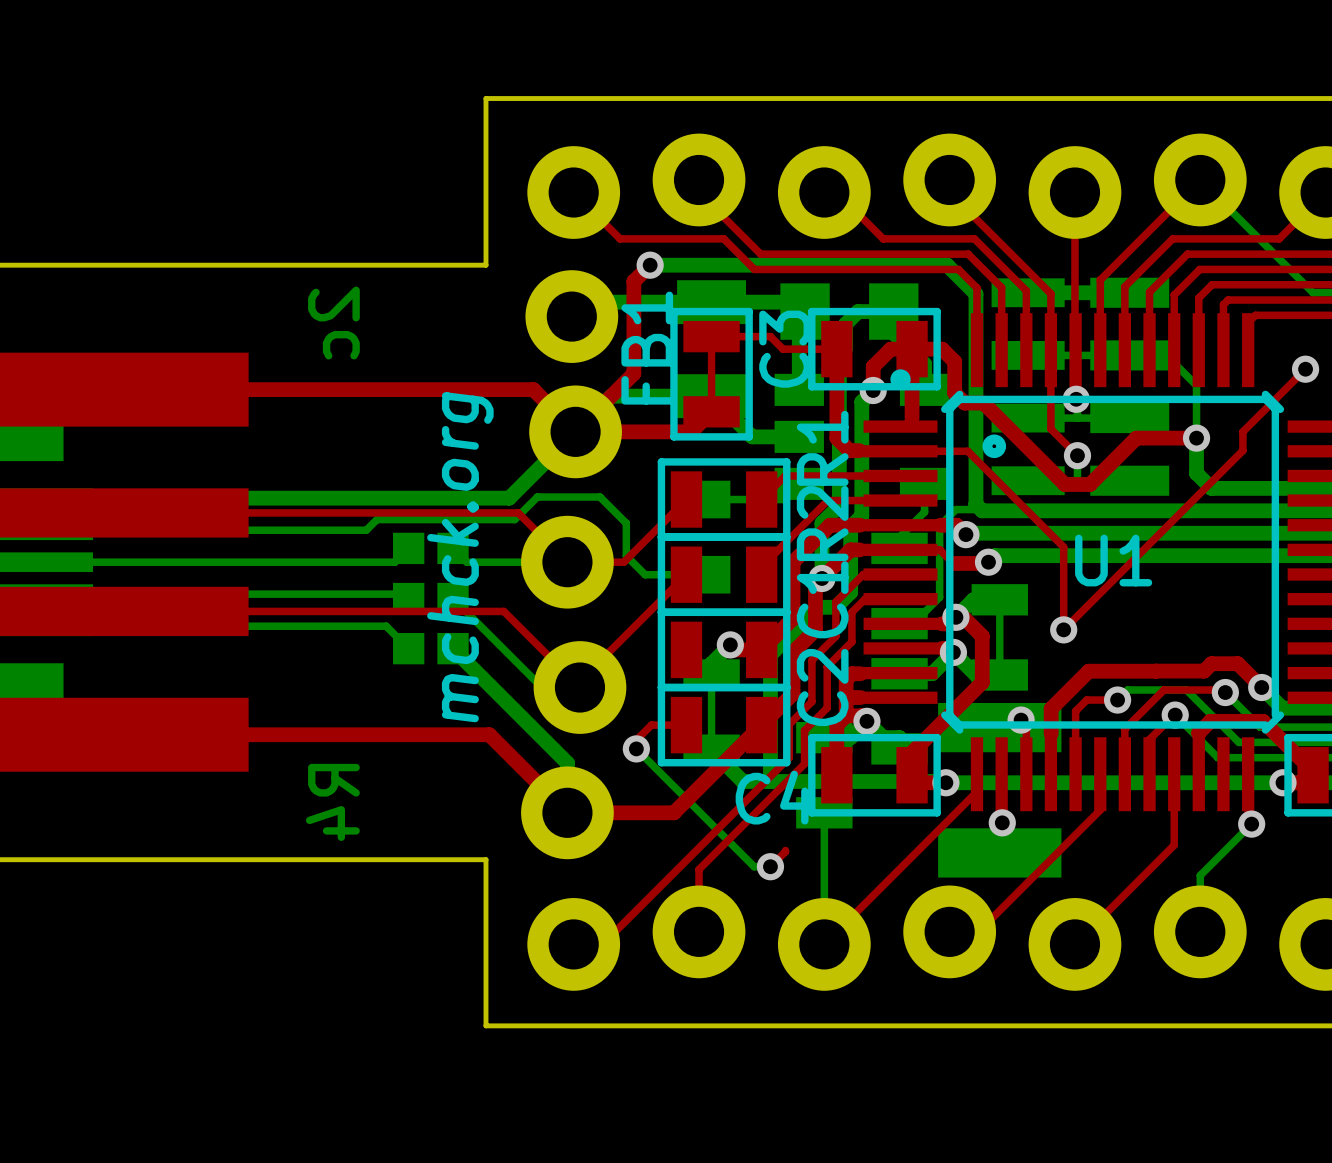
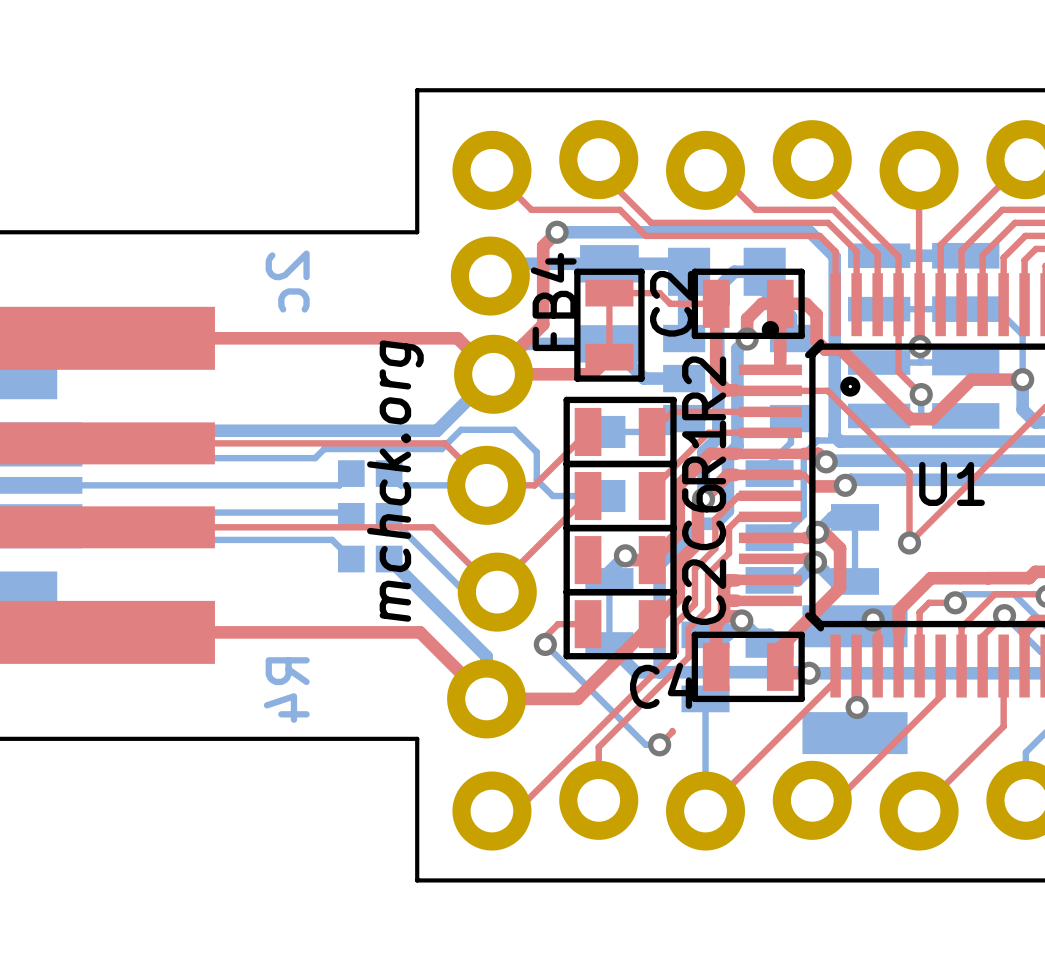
FB1 name: FB1 (647, 348) -> FB4 (553, 302)
C3 name: C3 (785, 349) -> C2 (672, 303)
R1 name: R1 (822, 448) -> R2 (704, 388)
R2 name: R2 (822, 523) -> R1 (704, 452)
C1 name: C1 (822, 599) -> C6 (704, 517)

